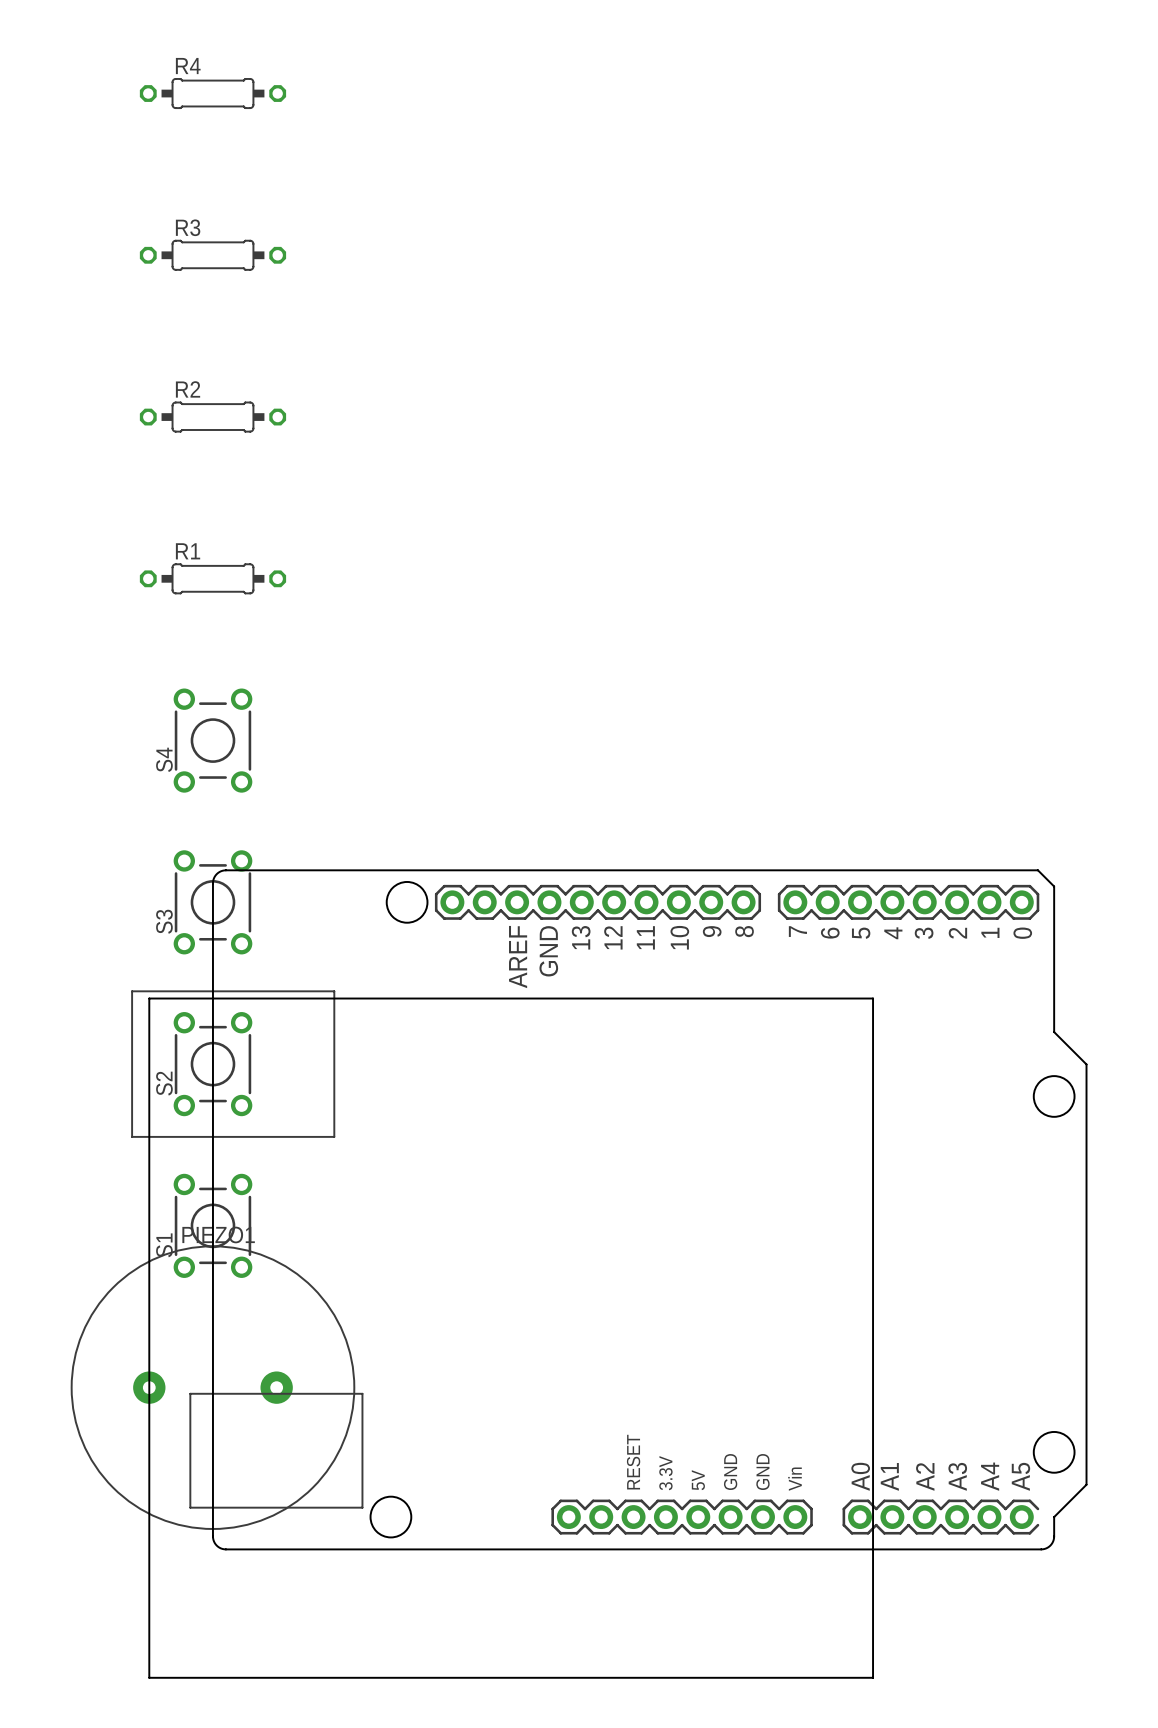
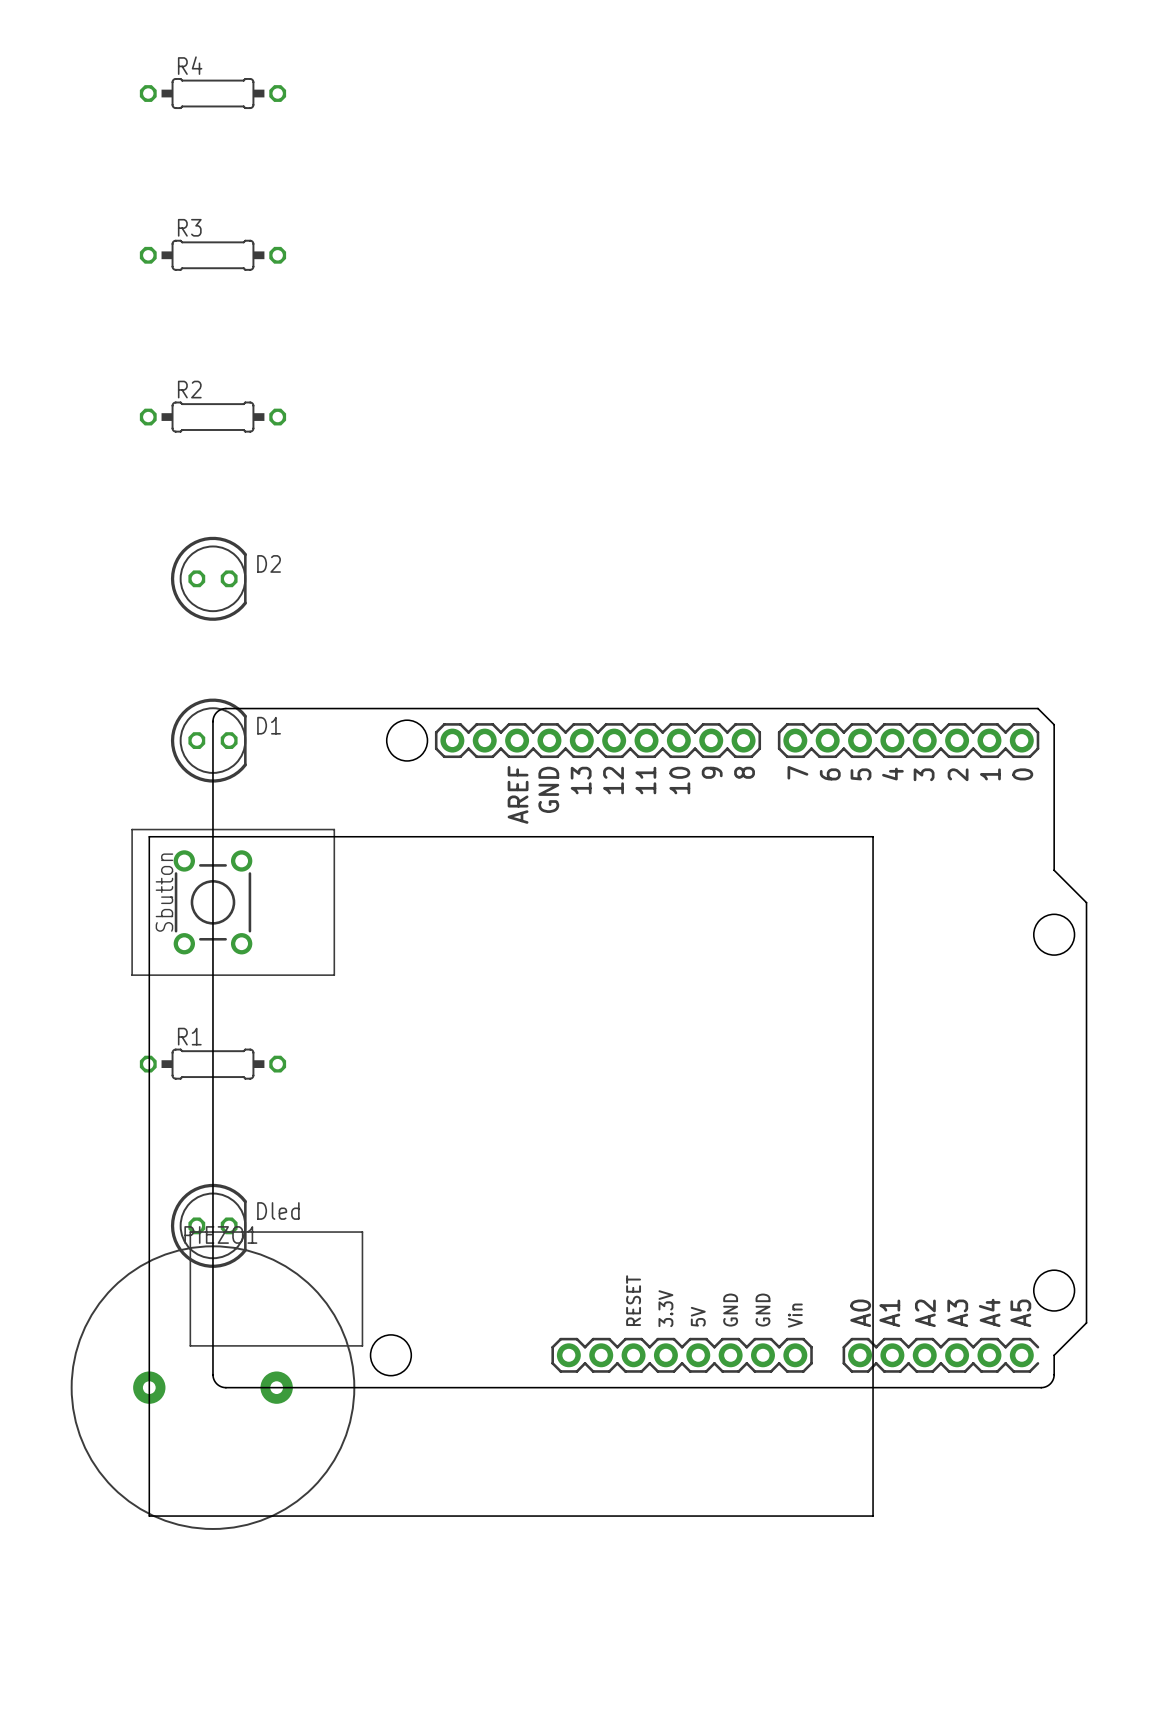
D2: none -> (208, 578)
R1 position: (212, 578) -> (212, 1064)
D1: none -> (208, 740)
S4: (212, 740) -> none
S3 name: S3 (164, 921) -> Sbutton (164, 892)
board edge: (149, 998) (873, 998) -> (149, 998) (149, 836) (873, 836) (873, 998)
S2: (212, 1064) -> none
part position: (609, 1209) -> (609, 1048)
Dled: none -> (208, 1225)
S1: (212, 1225) -> none
board edge: (149, 1516) (149, 1677) (873, 1677) (873, 1516) -> (149, 1516) (873, 1516)

